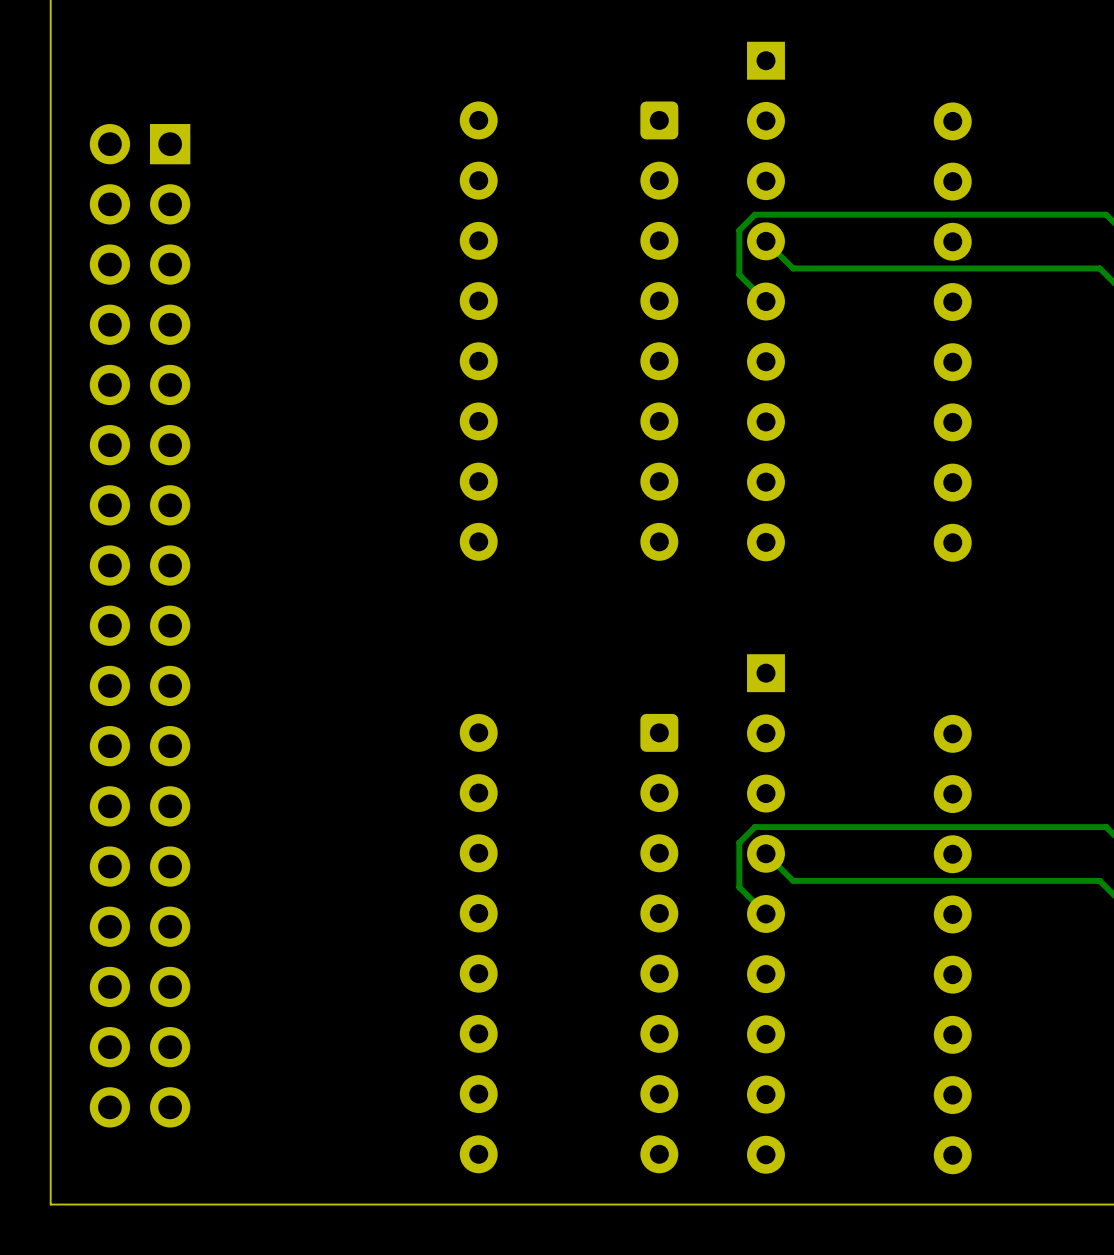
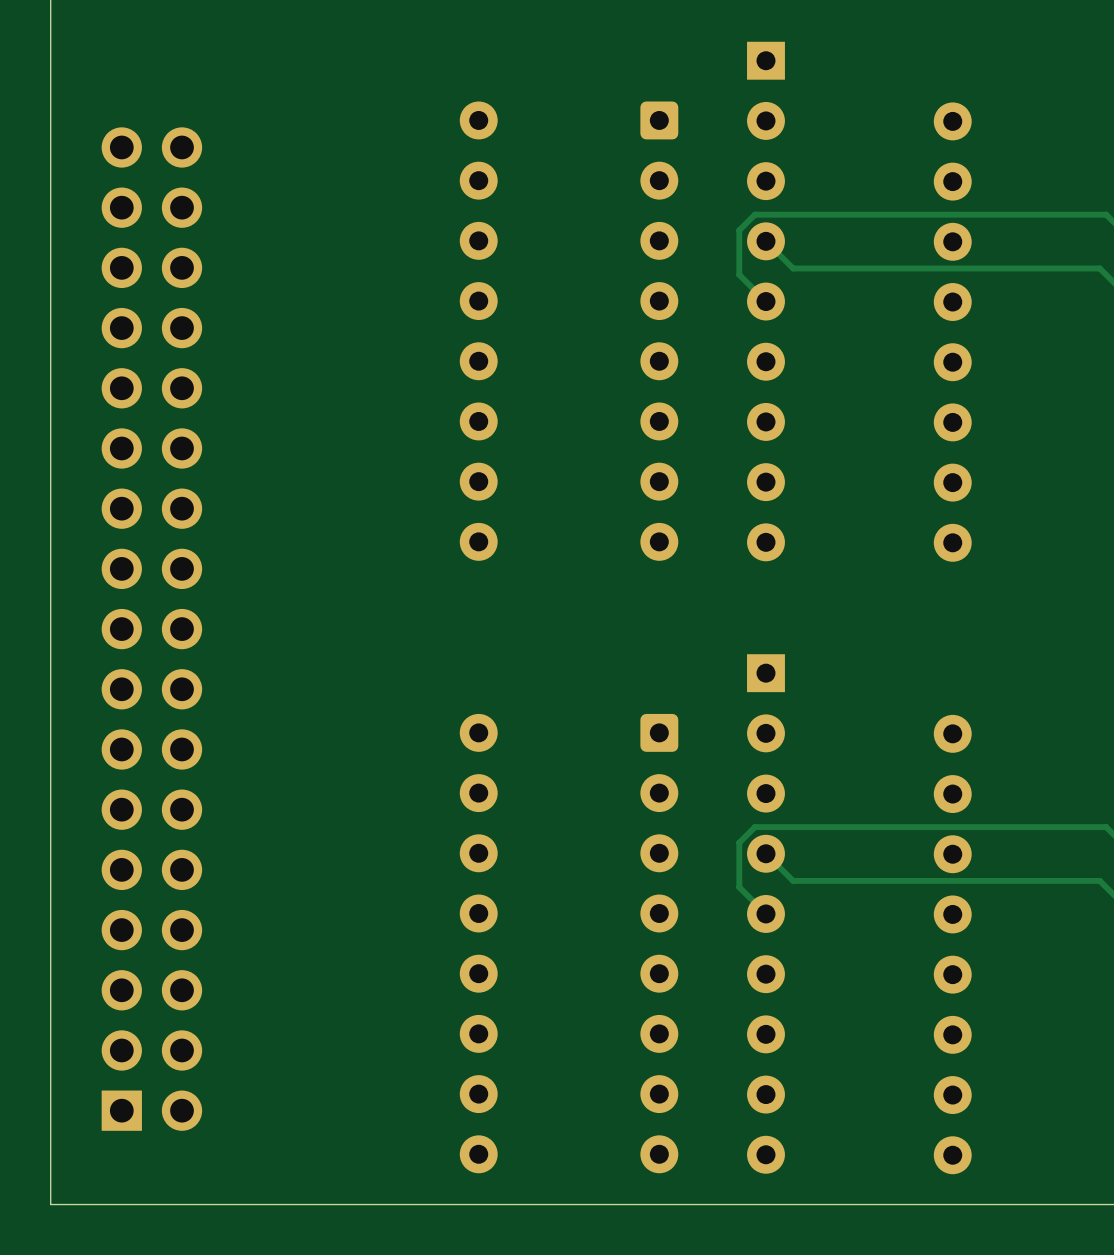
part rotation: 0° (140, 625) -> 180° (151, 629)

